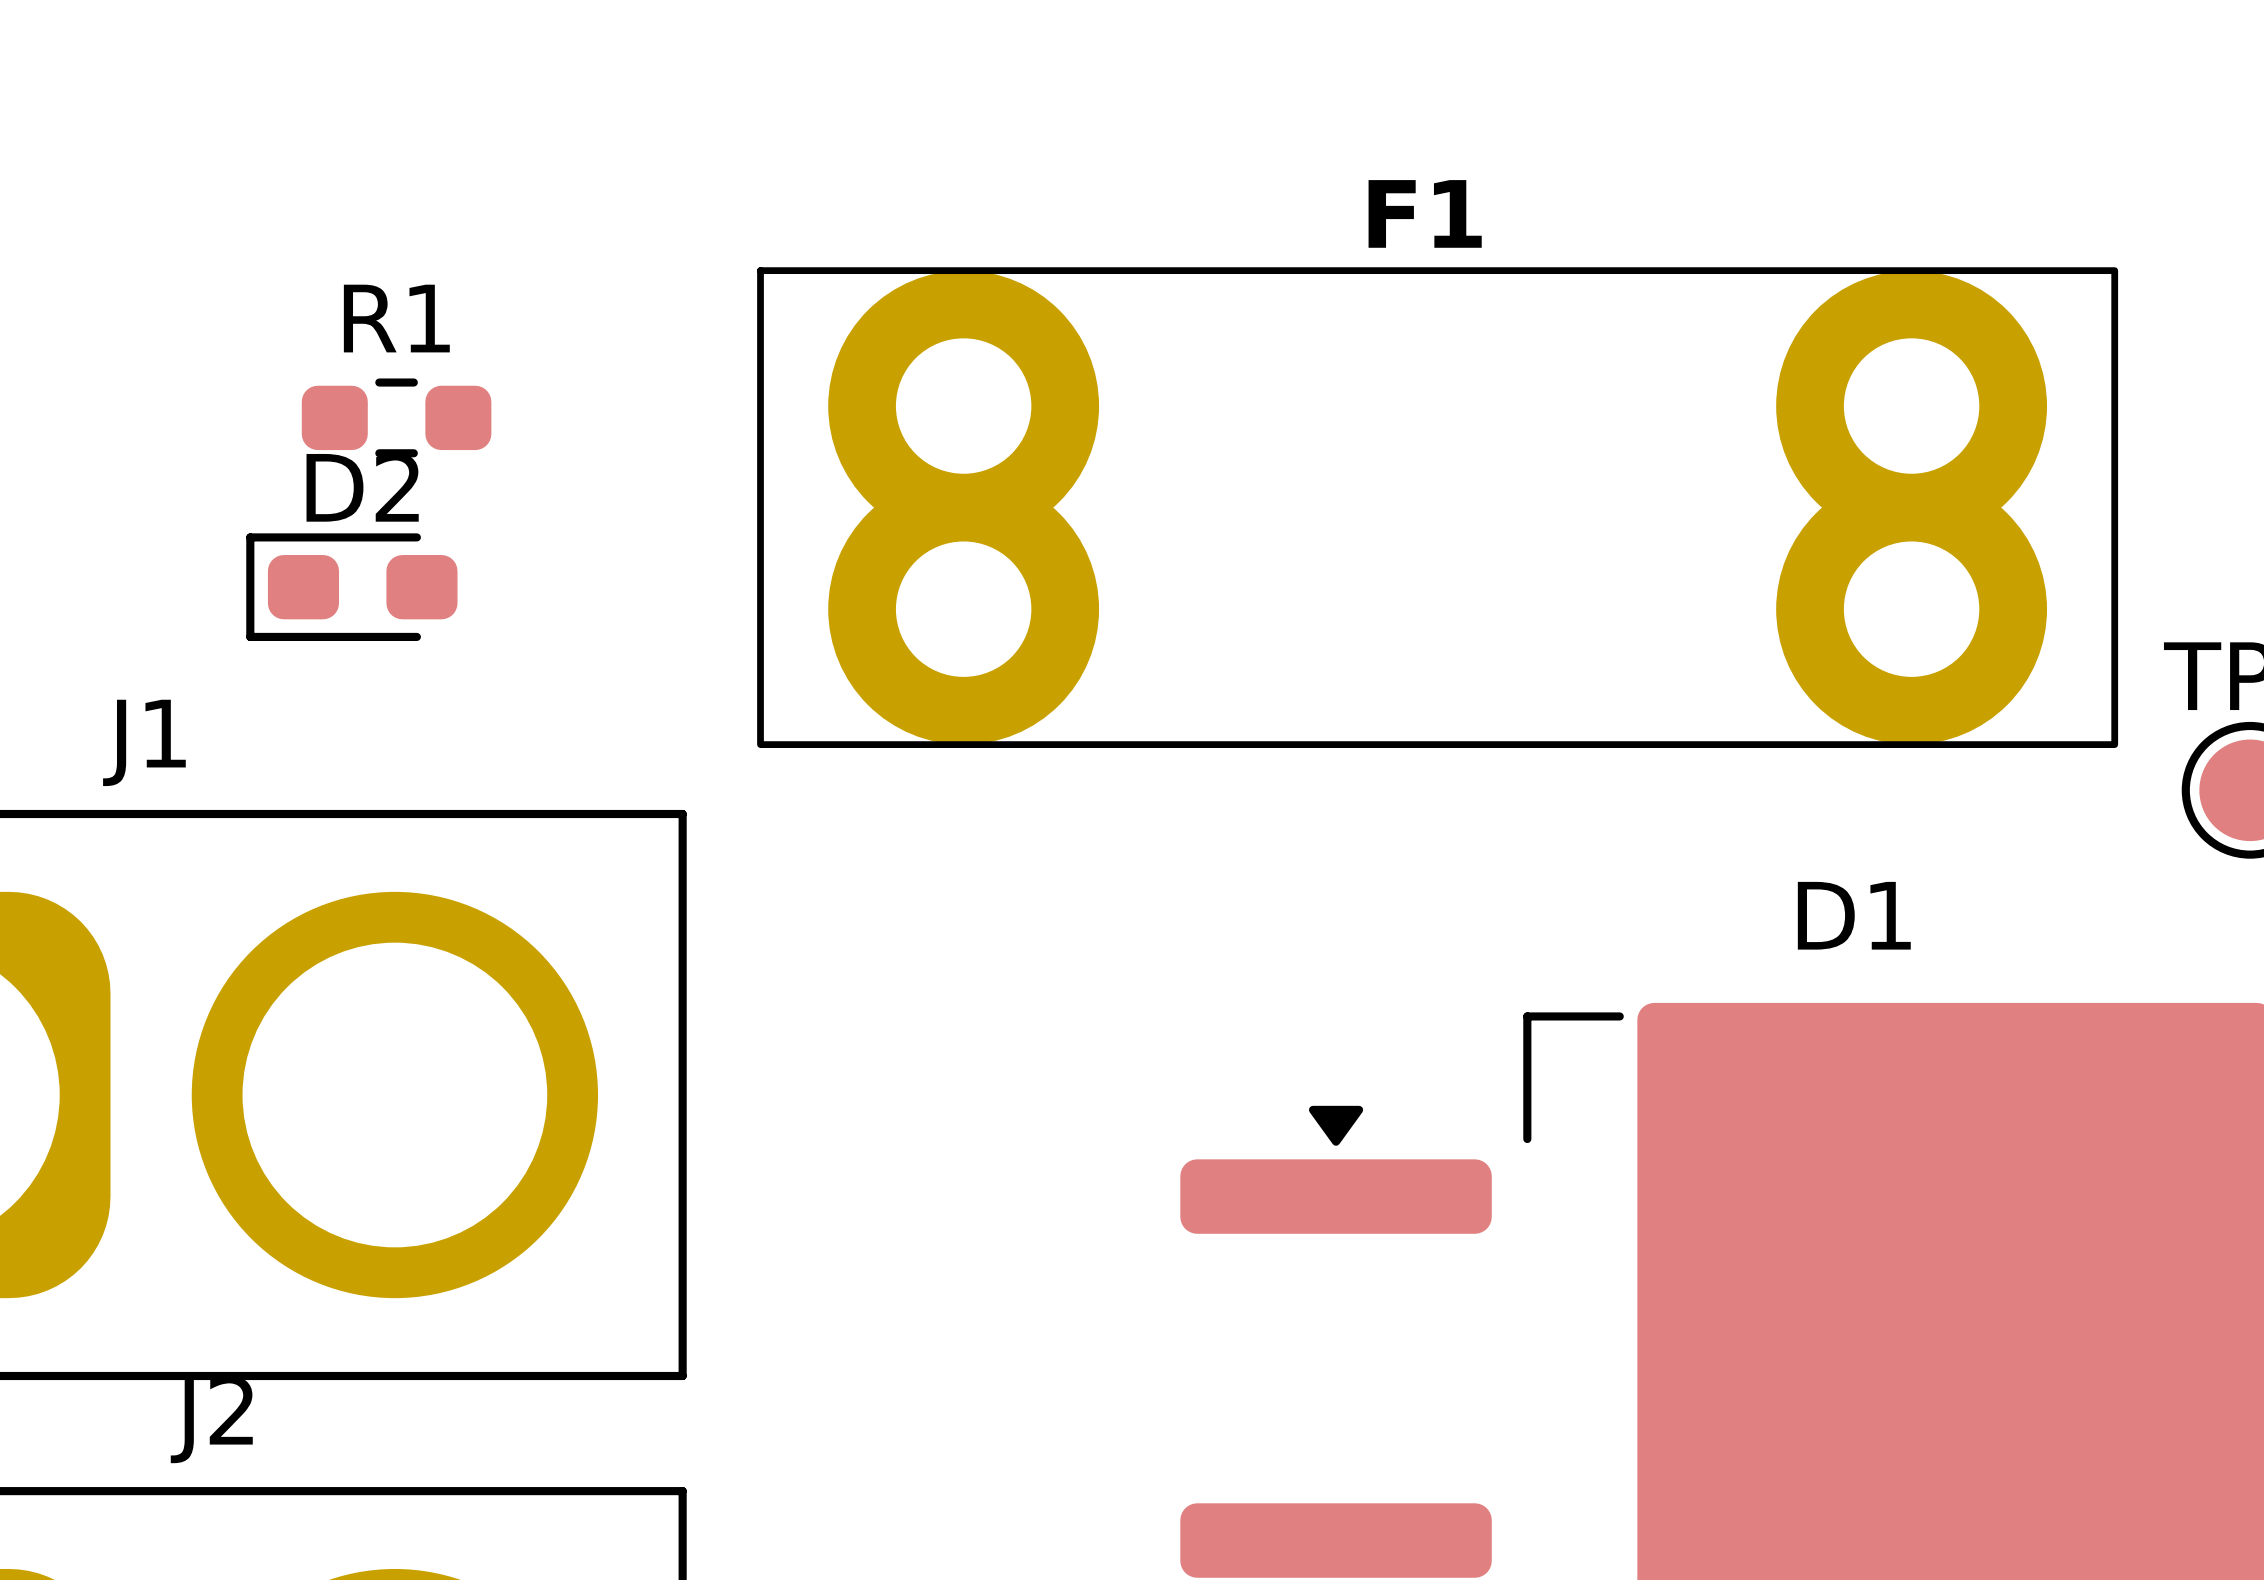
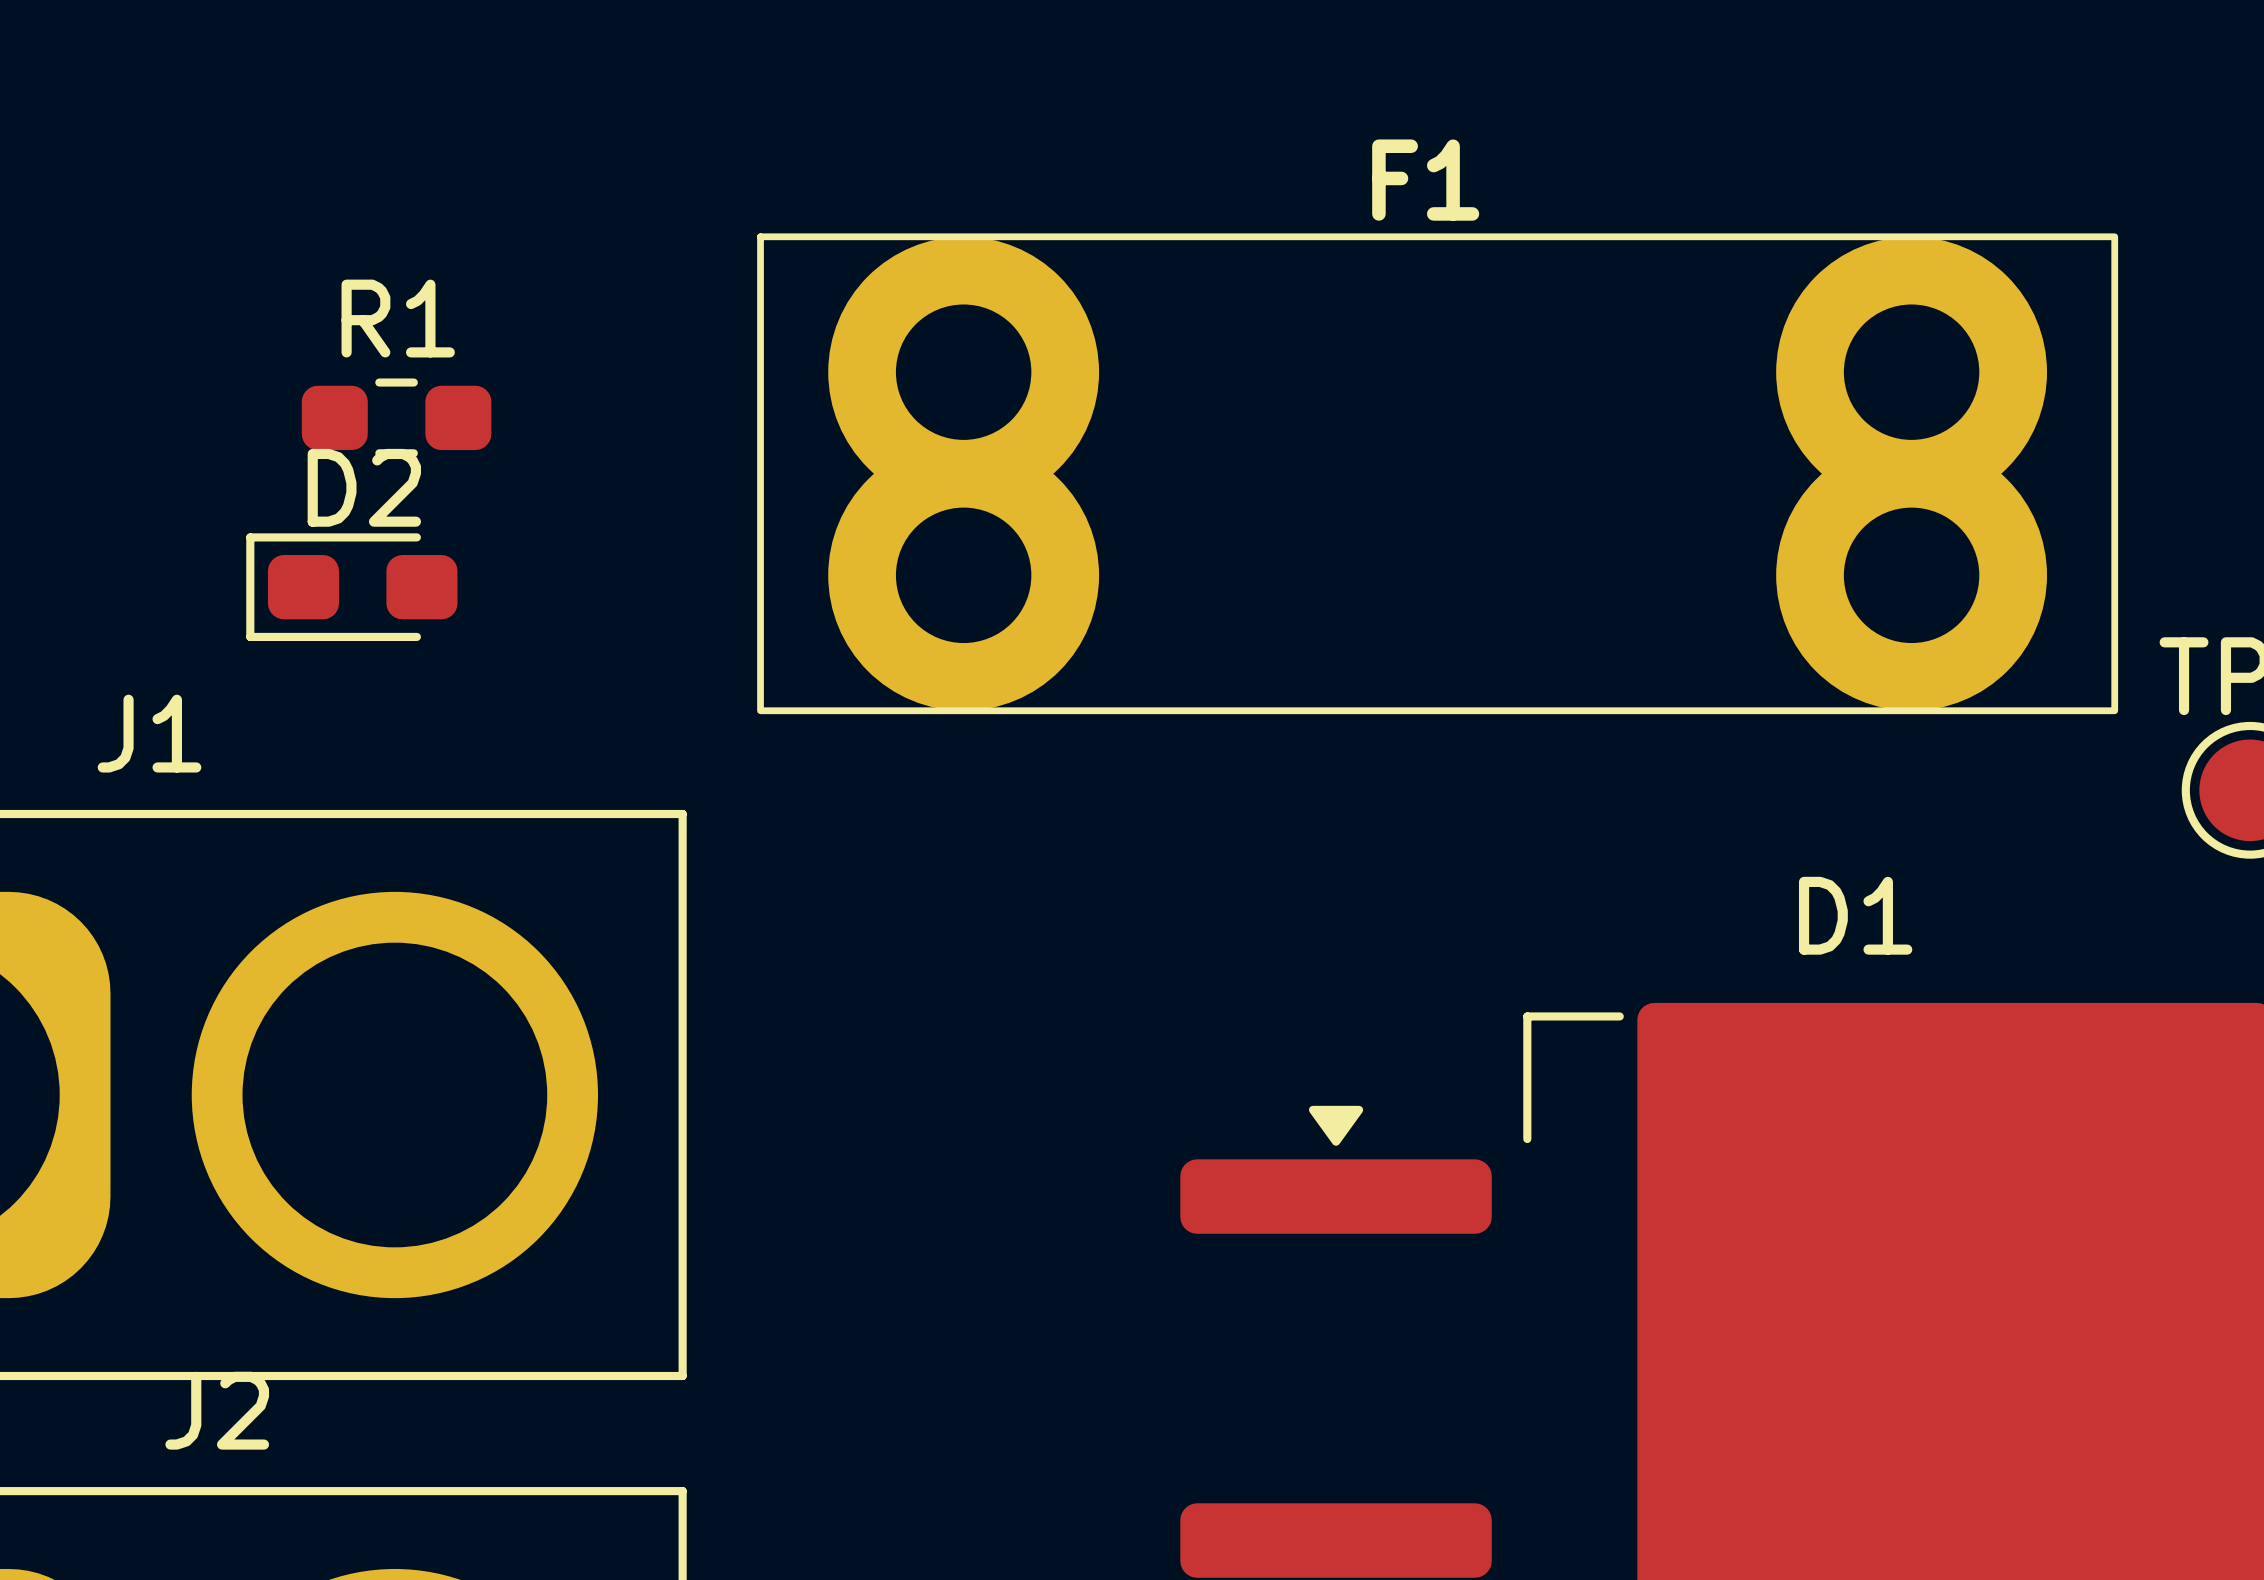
F1 position: (1437, 507) -> (1437, 473)

